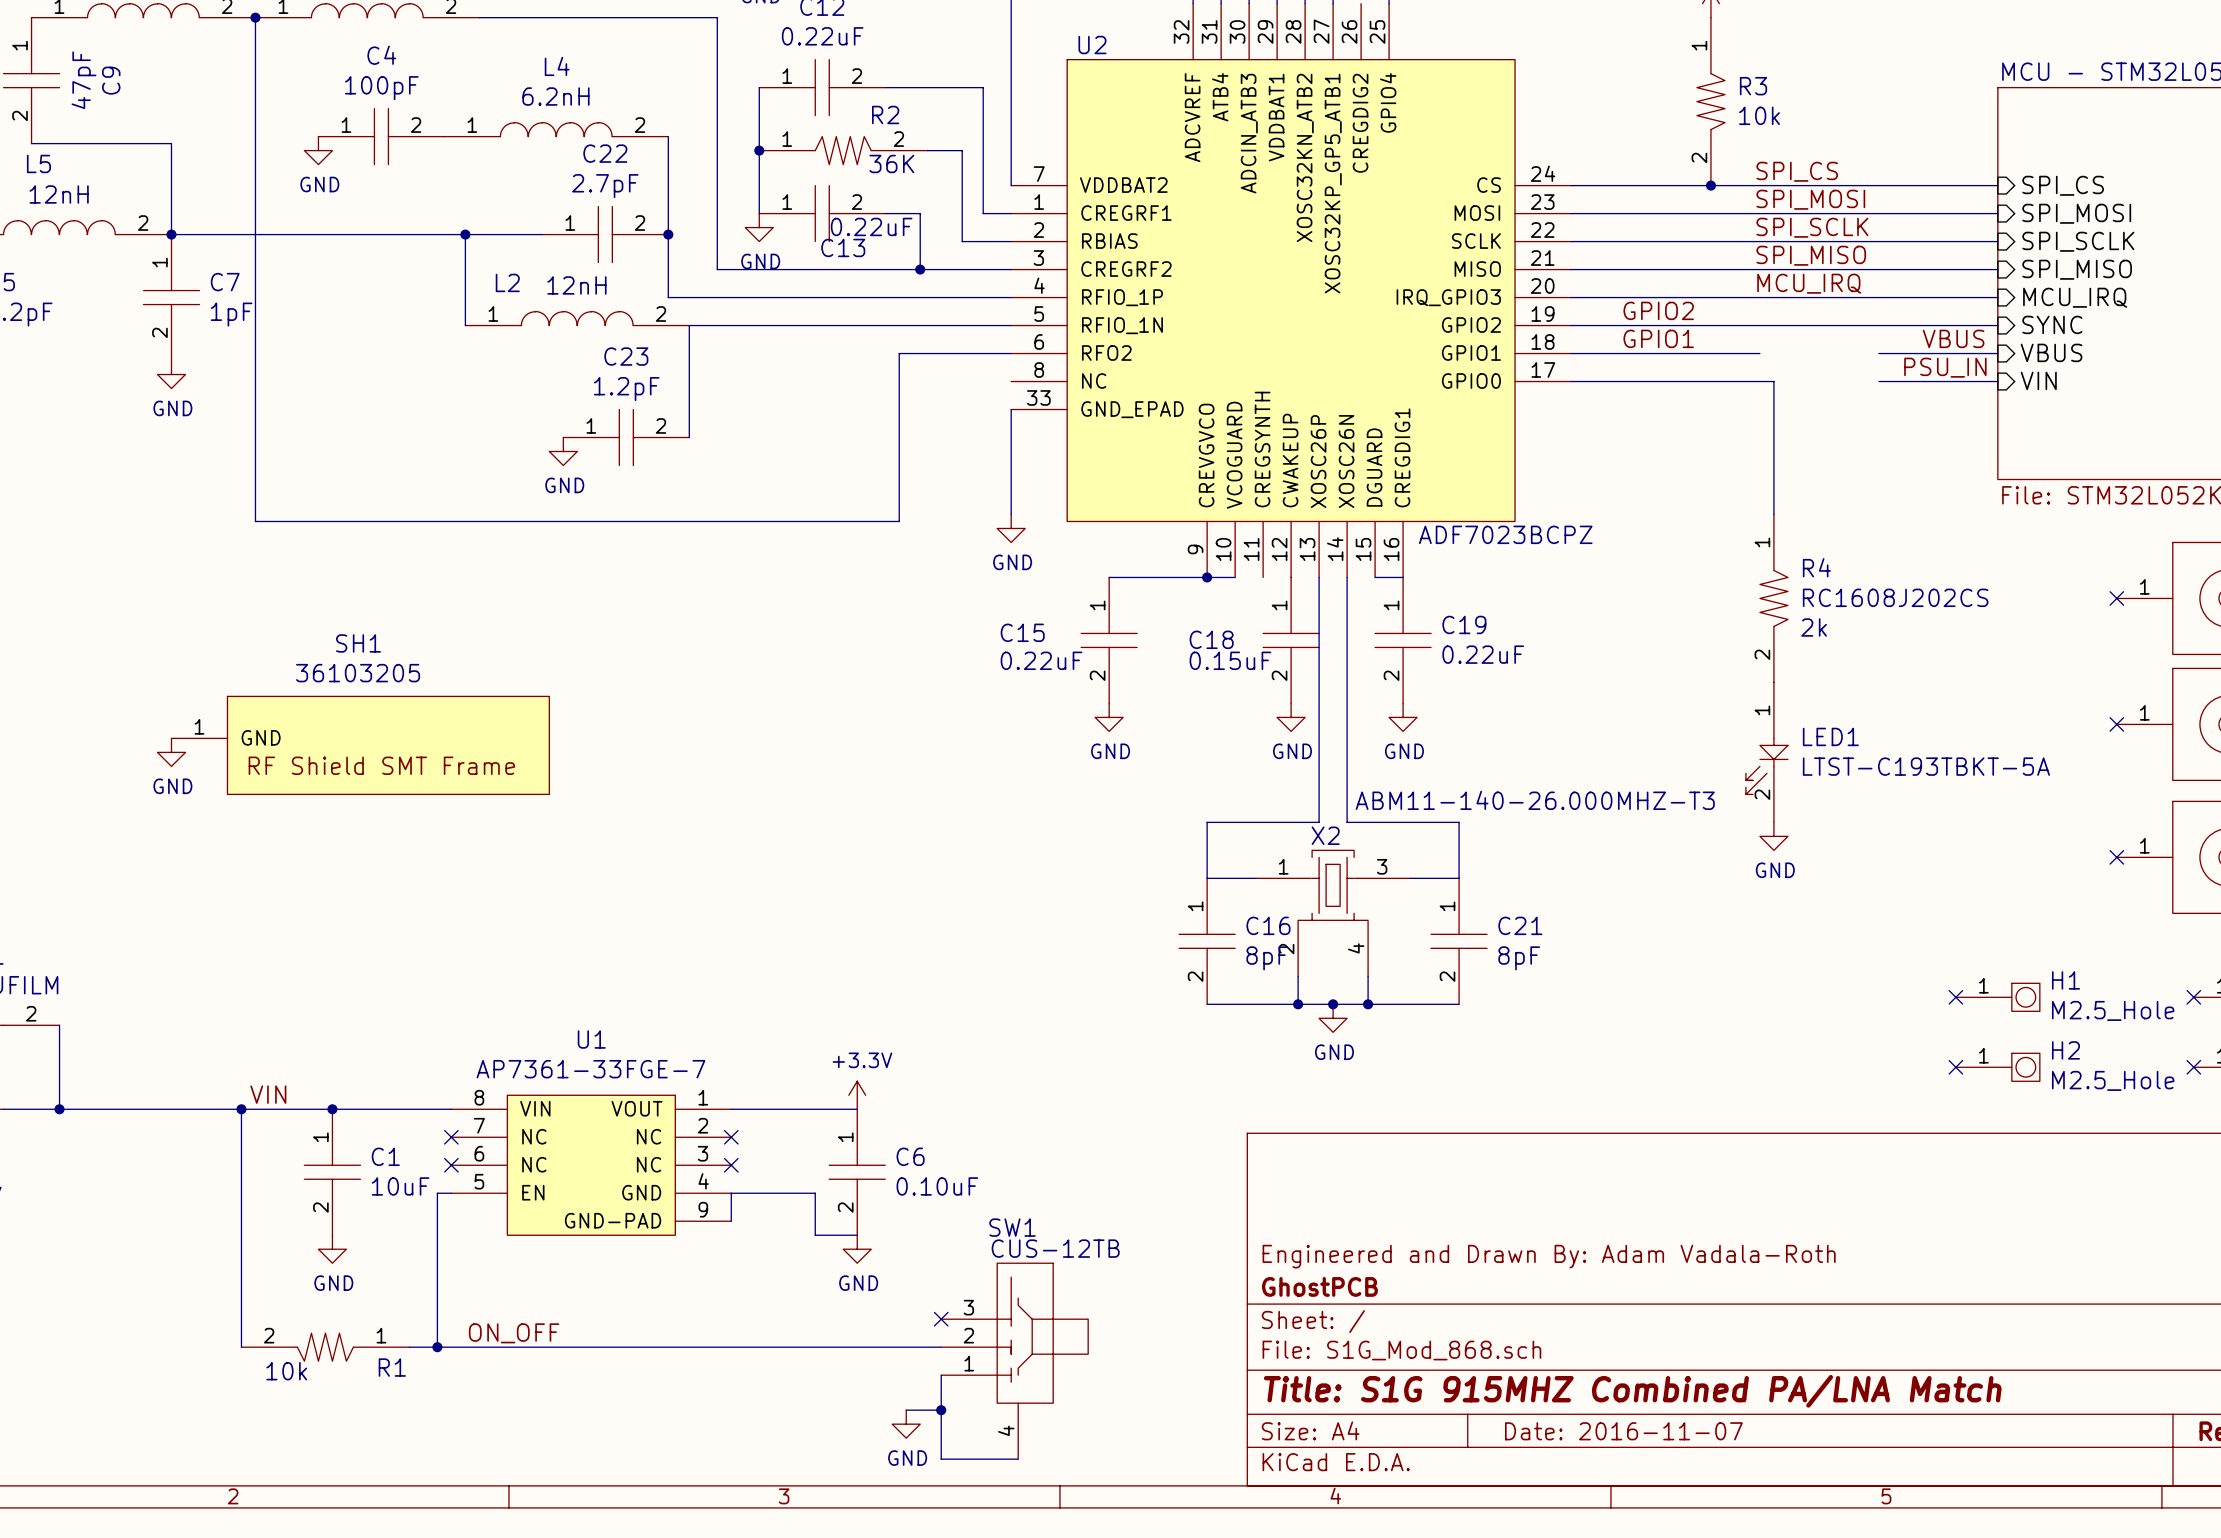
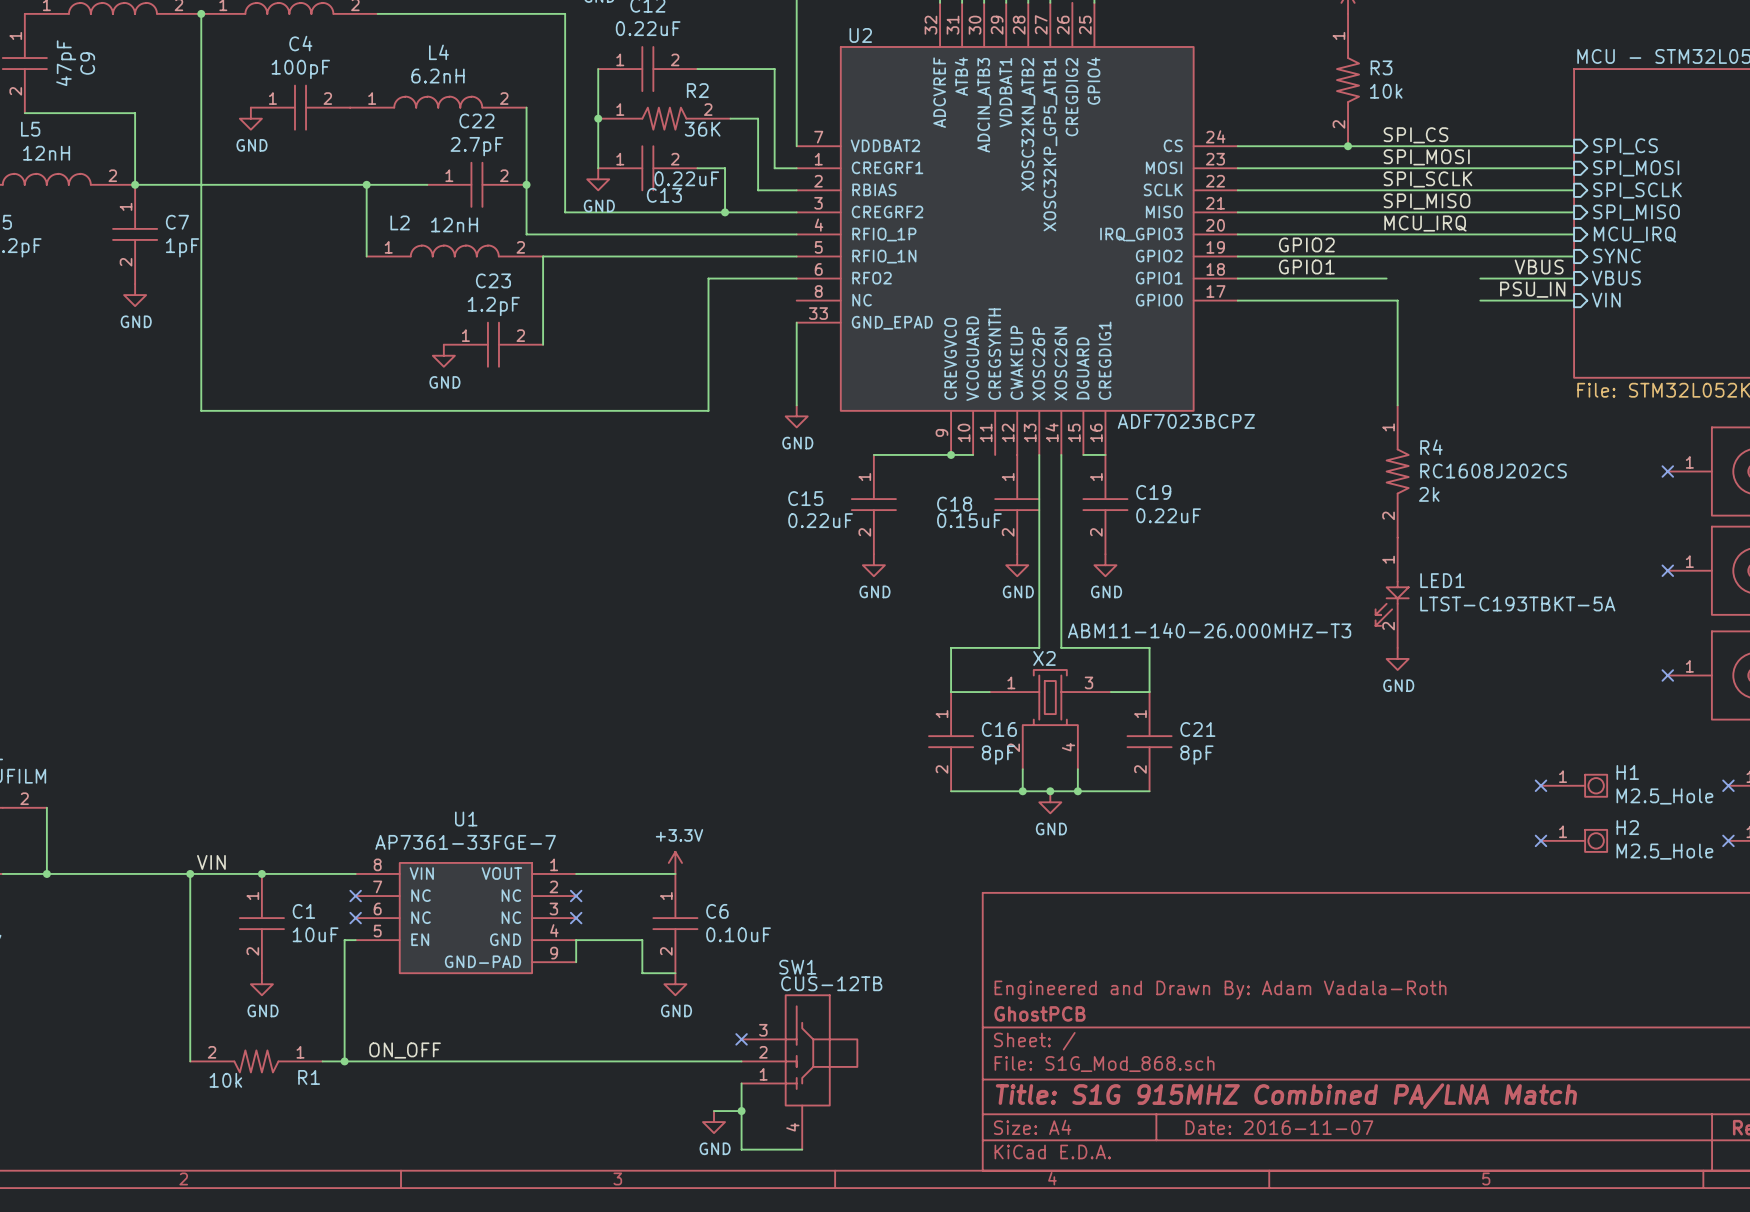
SH1: 36103205 (360, 745) -> none
power symbol: GND (171, 752) -> none

